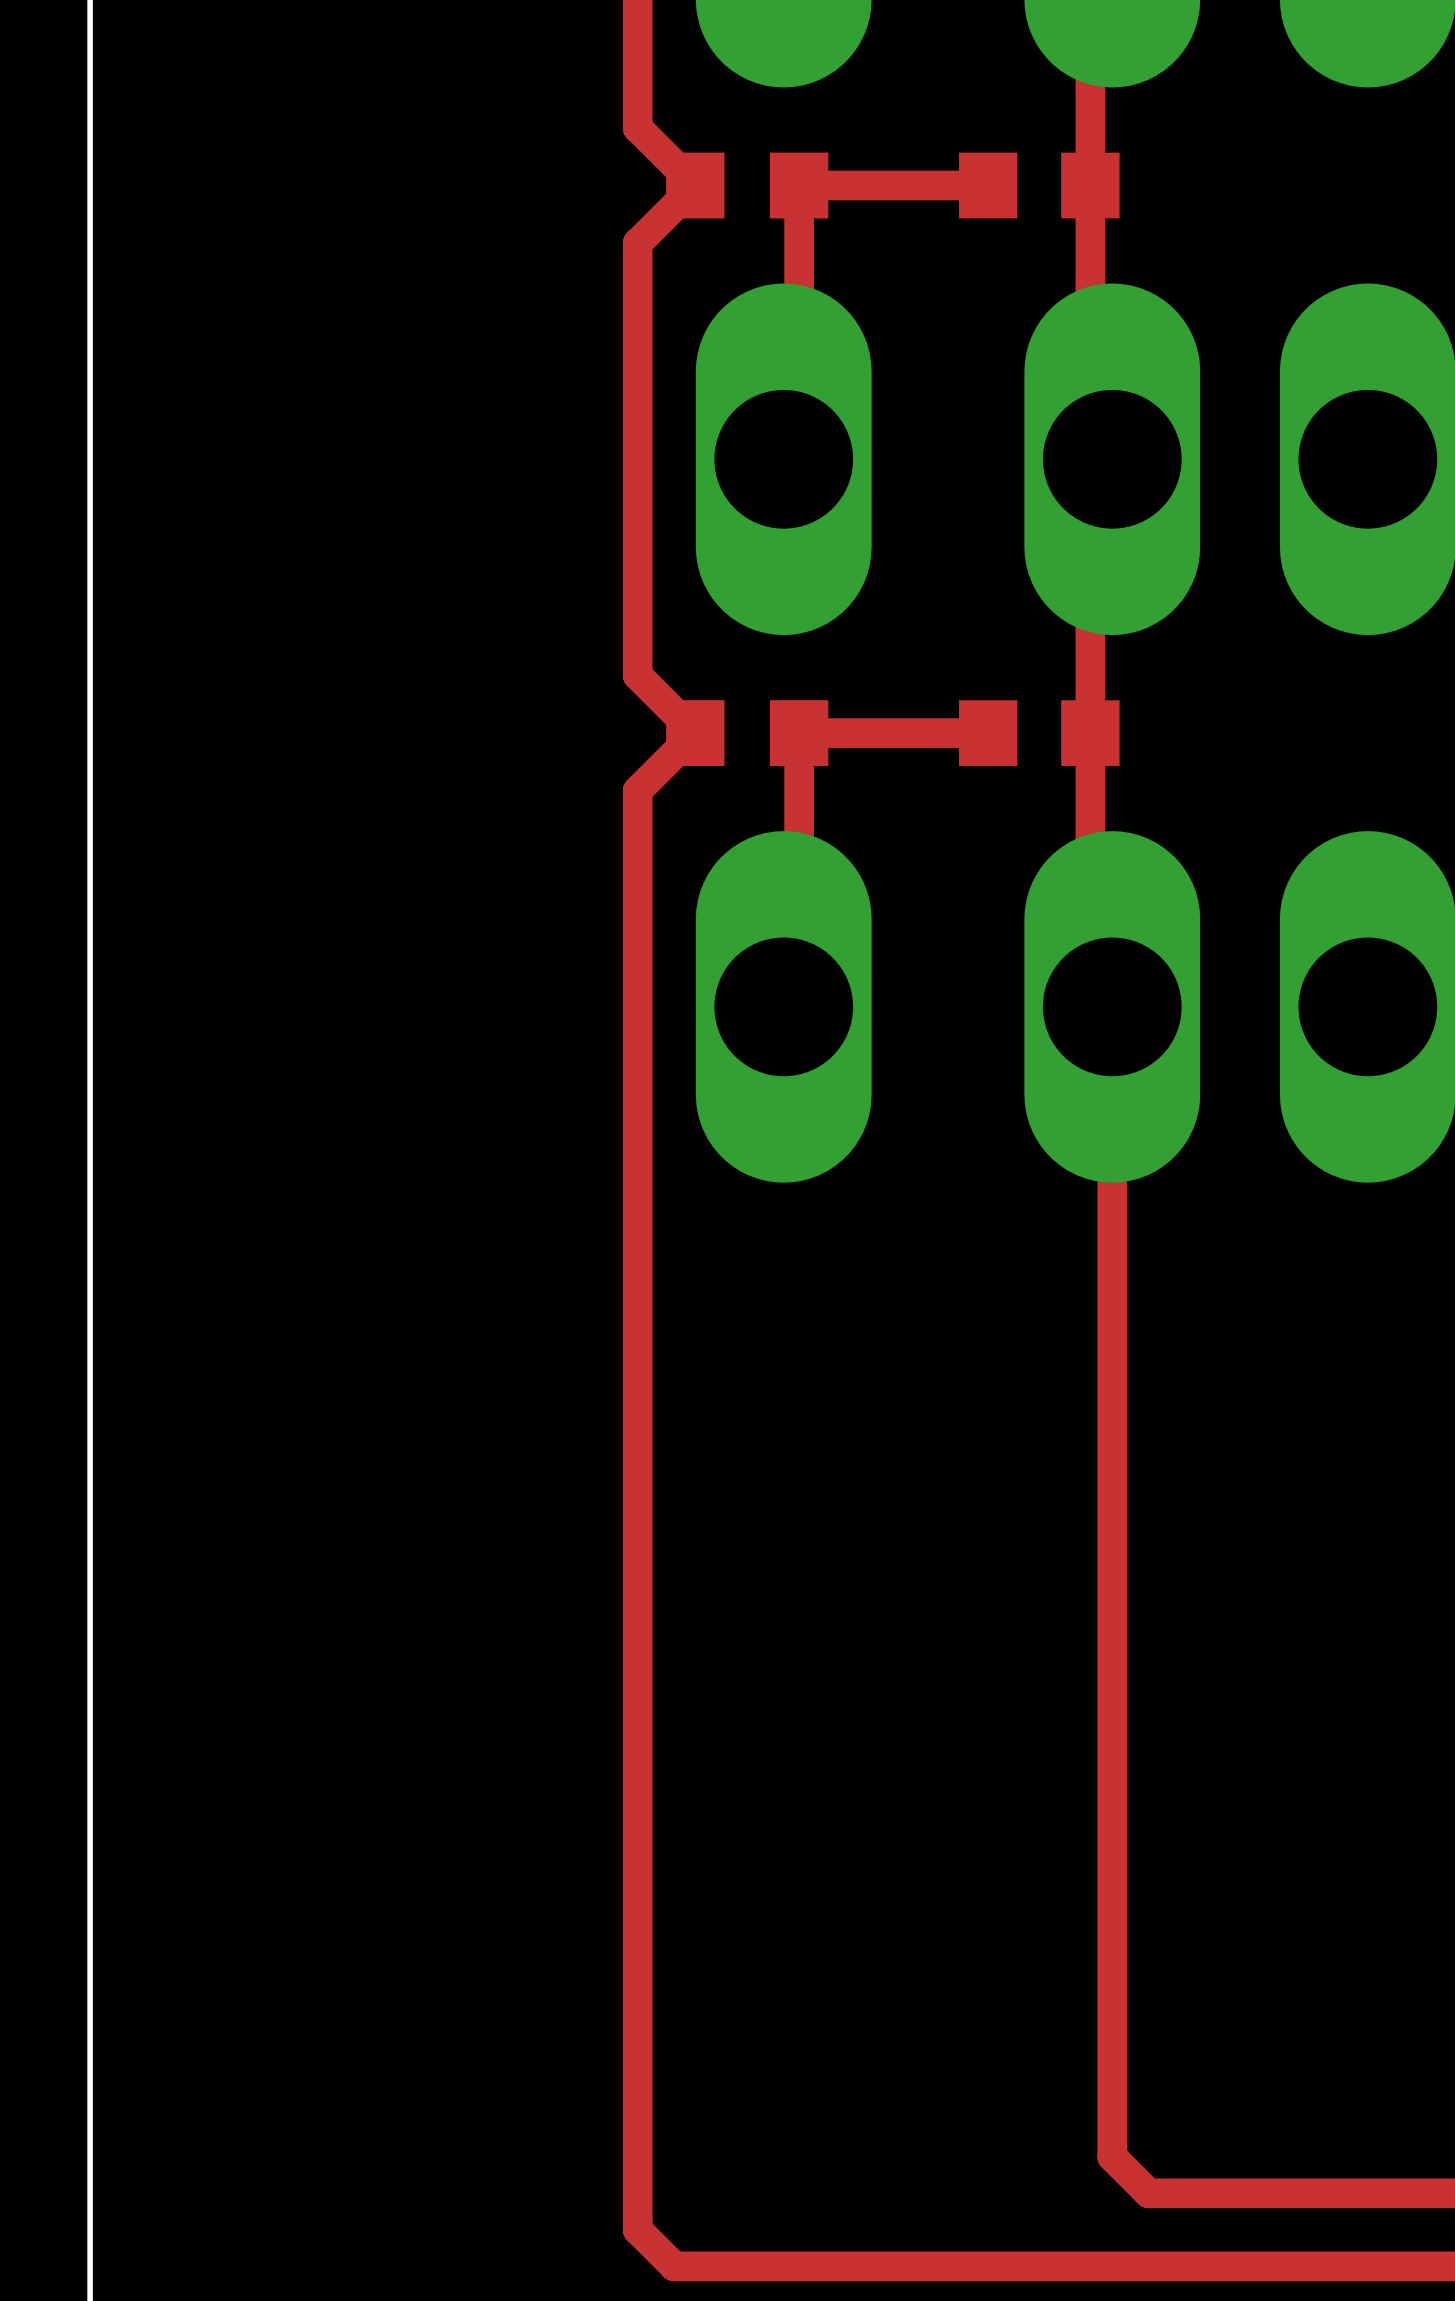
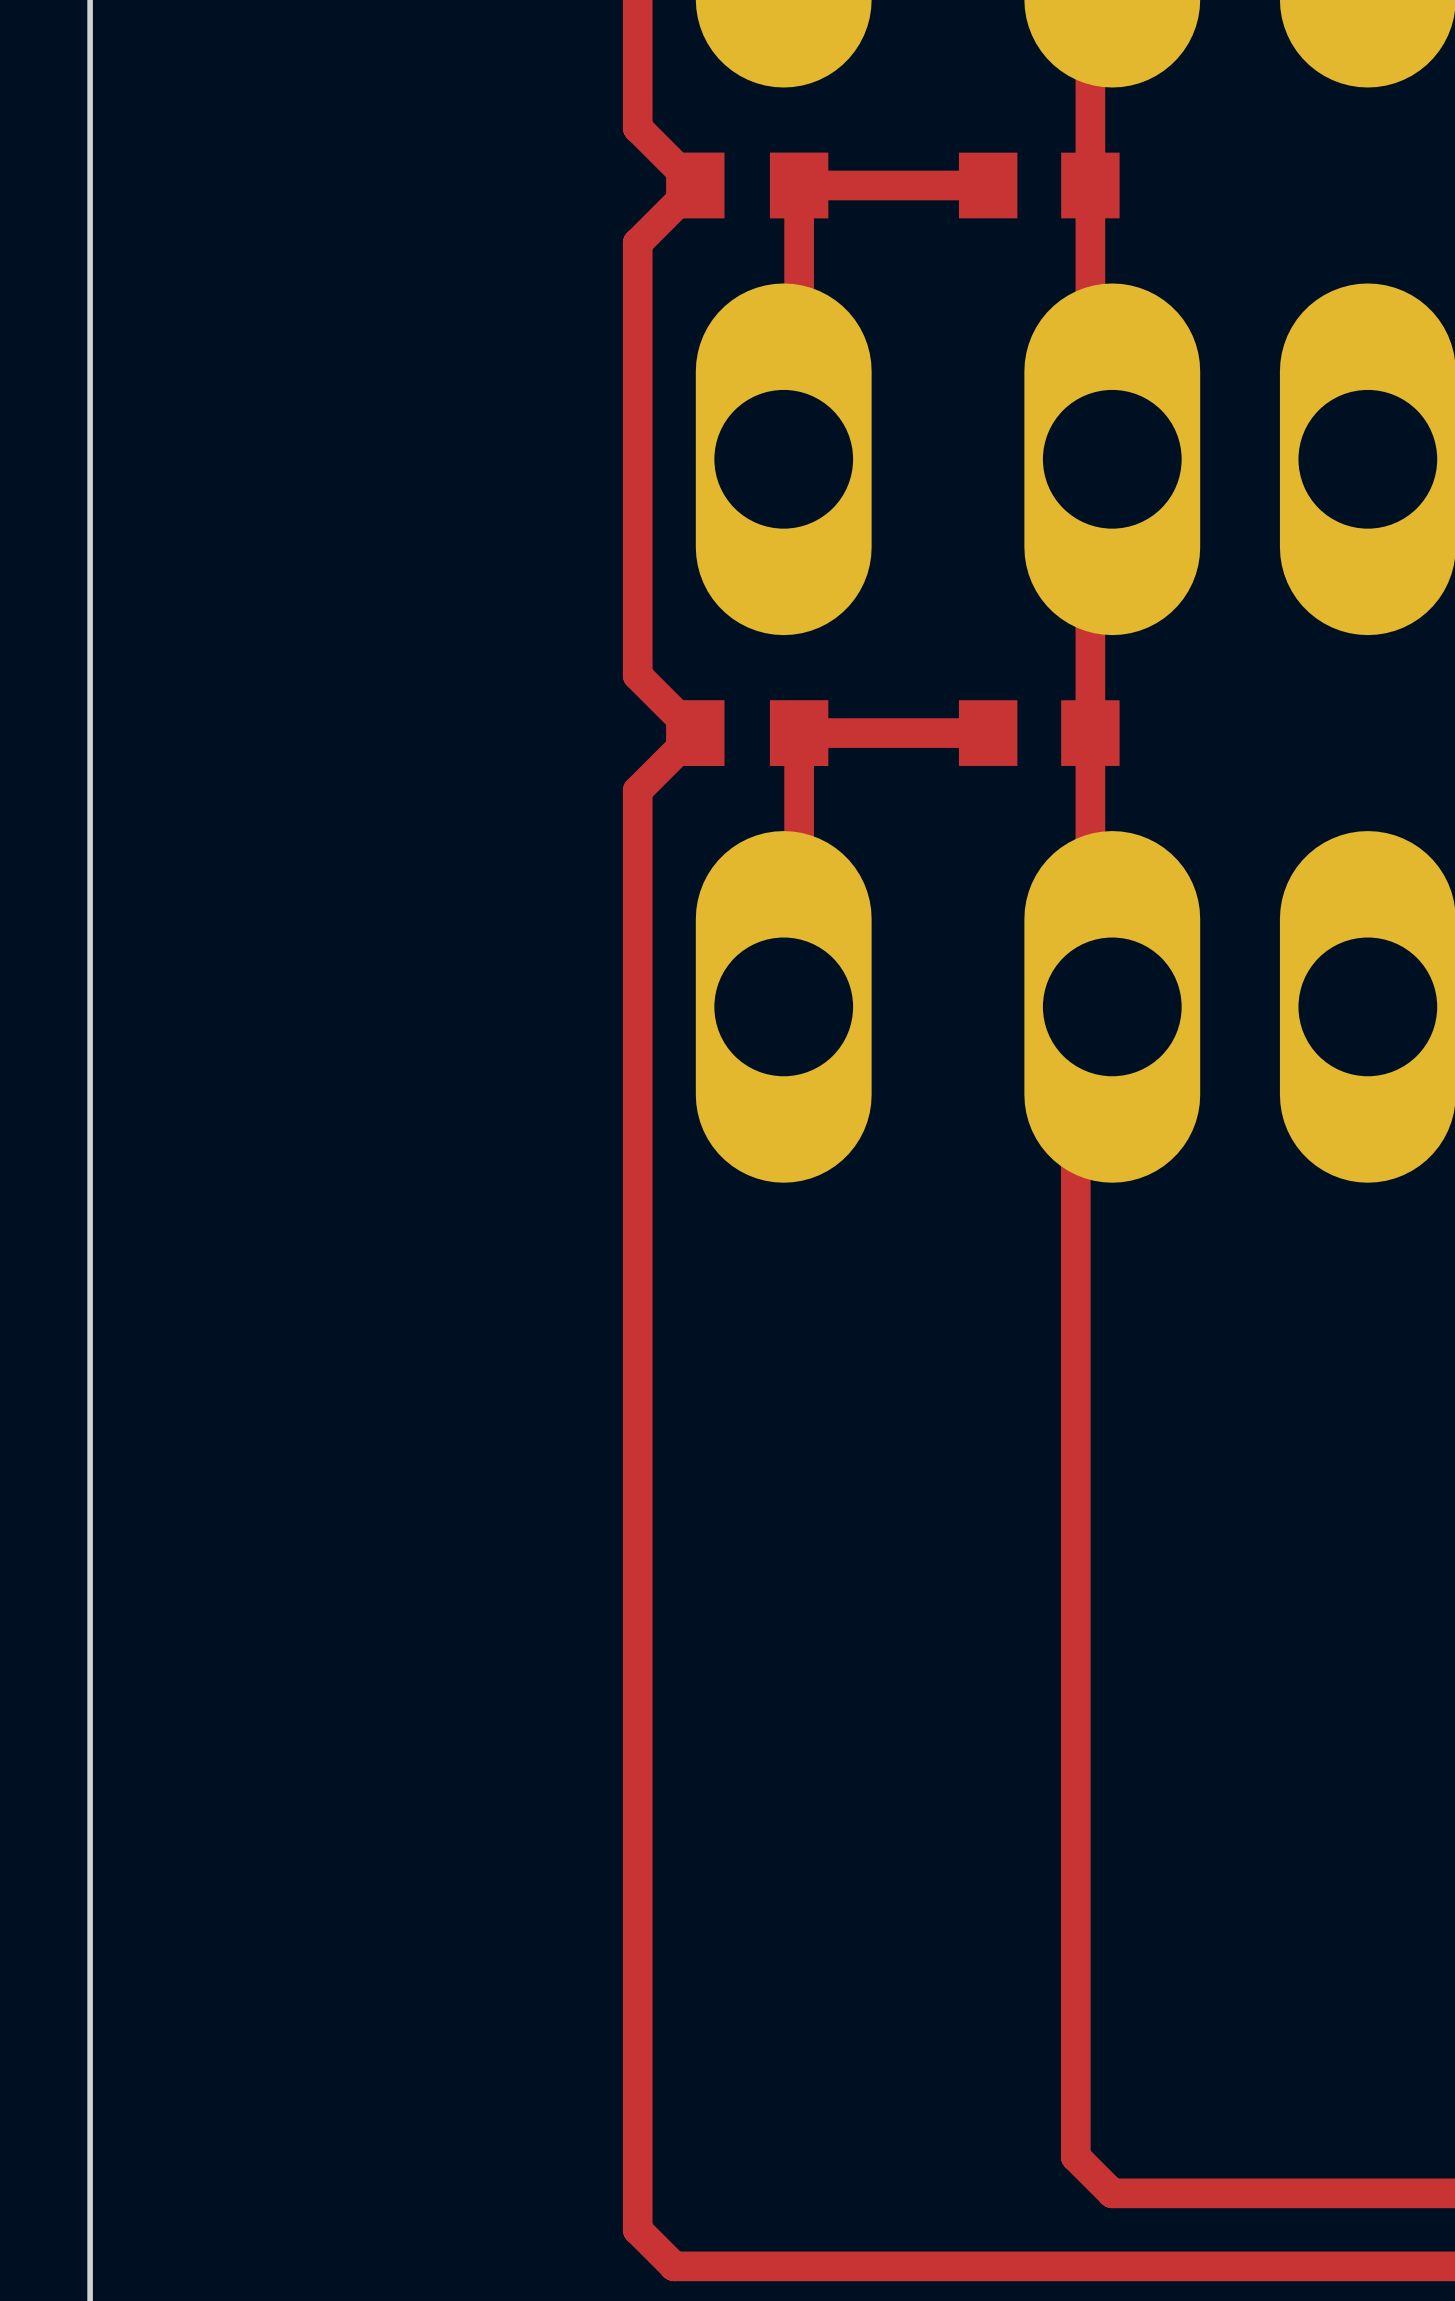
top track: (1112, 1006) (1112, 2156) (1148, 2193) -> (1112, 1006) (1075, 1043) (1075, 2156) (1112, 2193) (1148, 2193)

